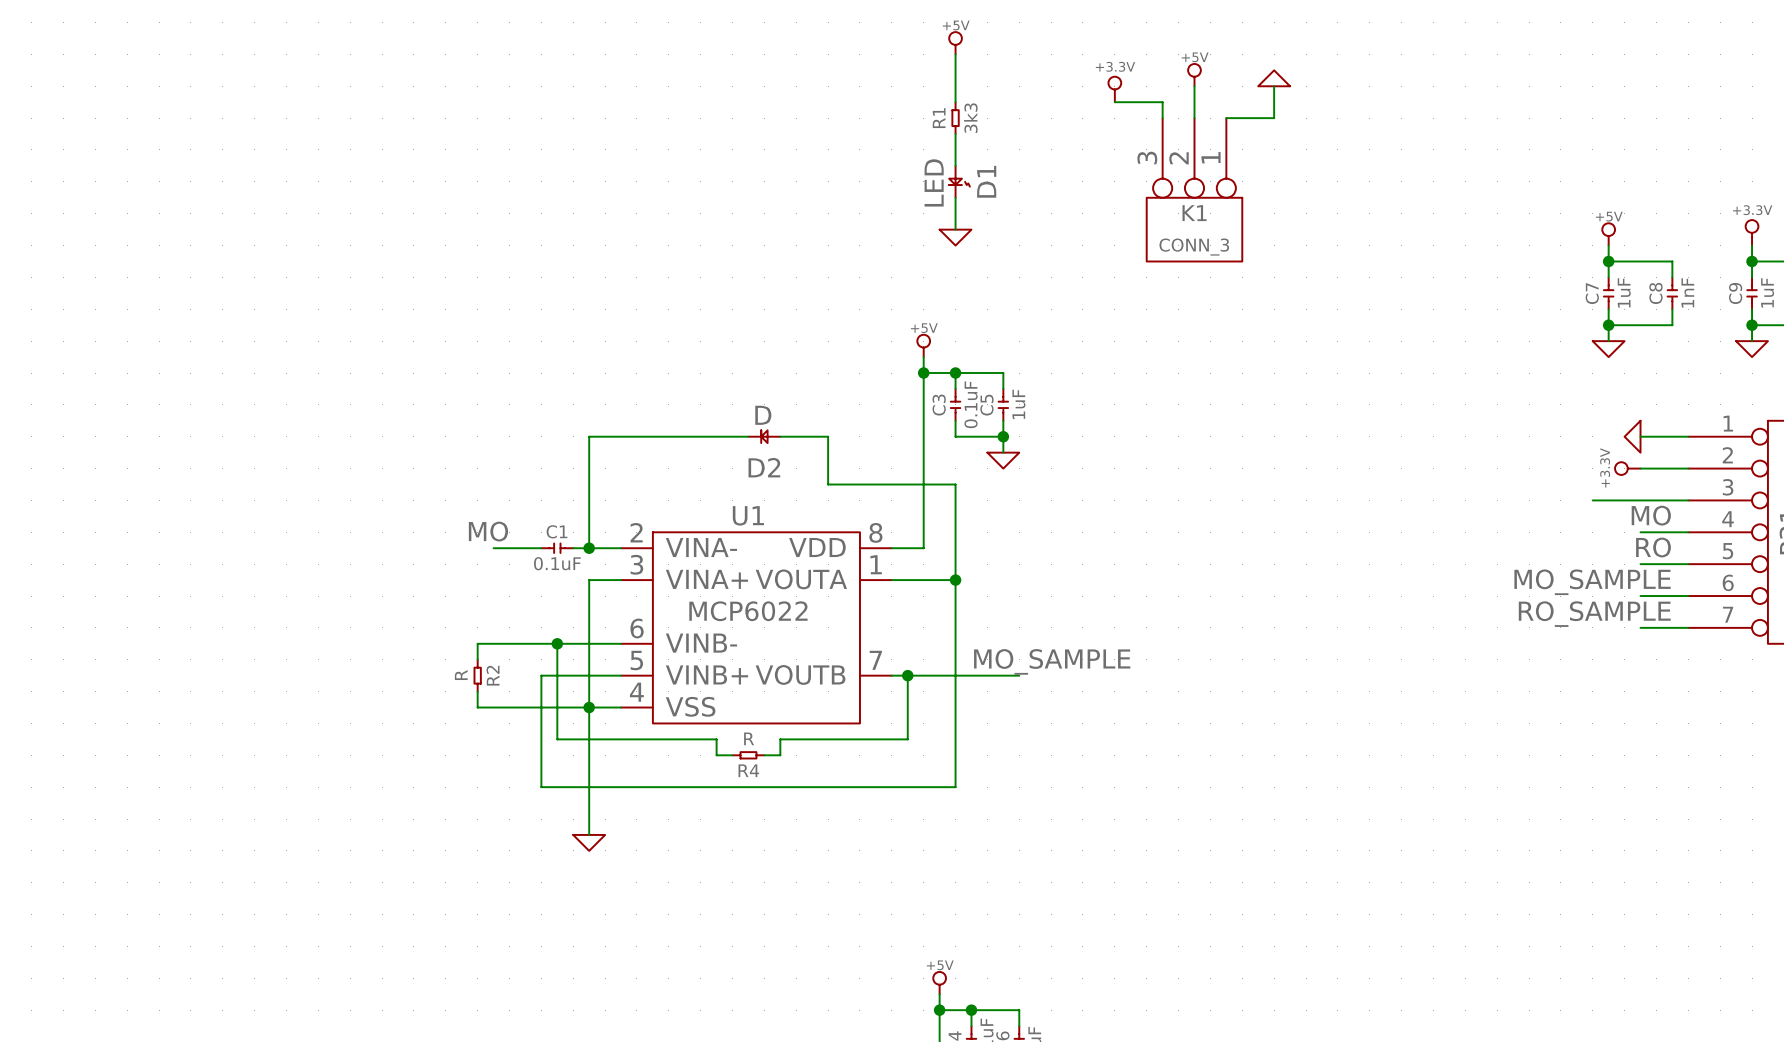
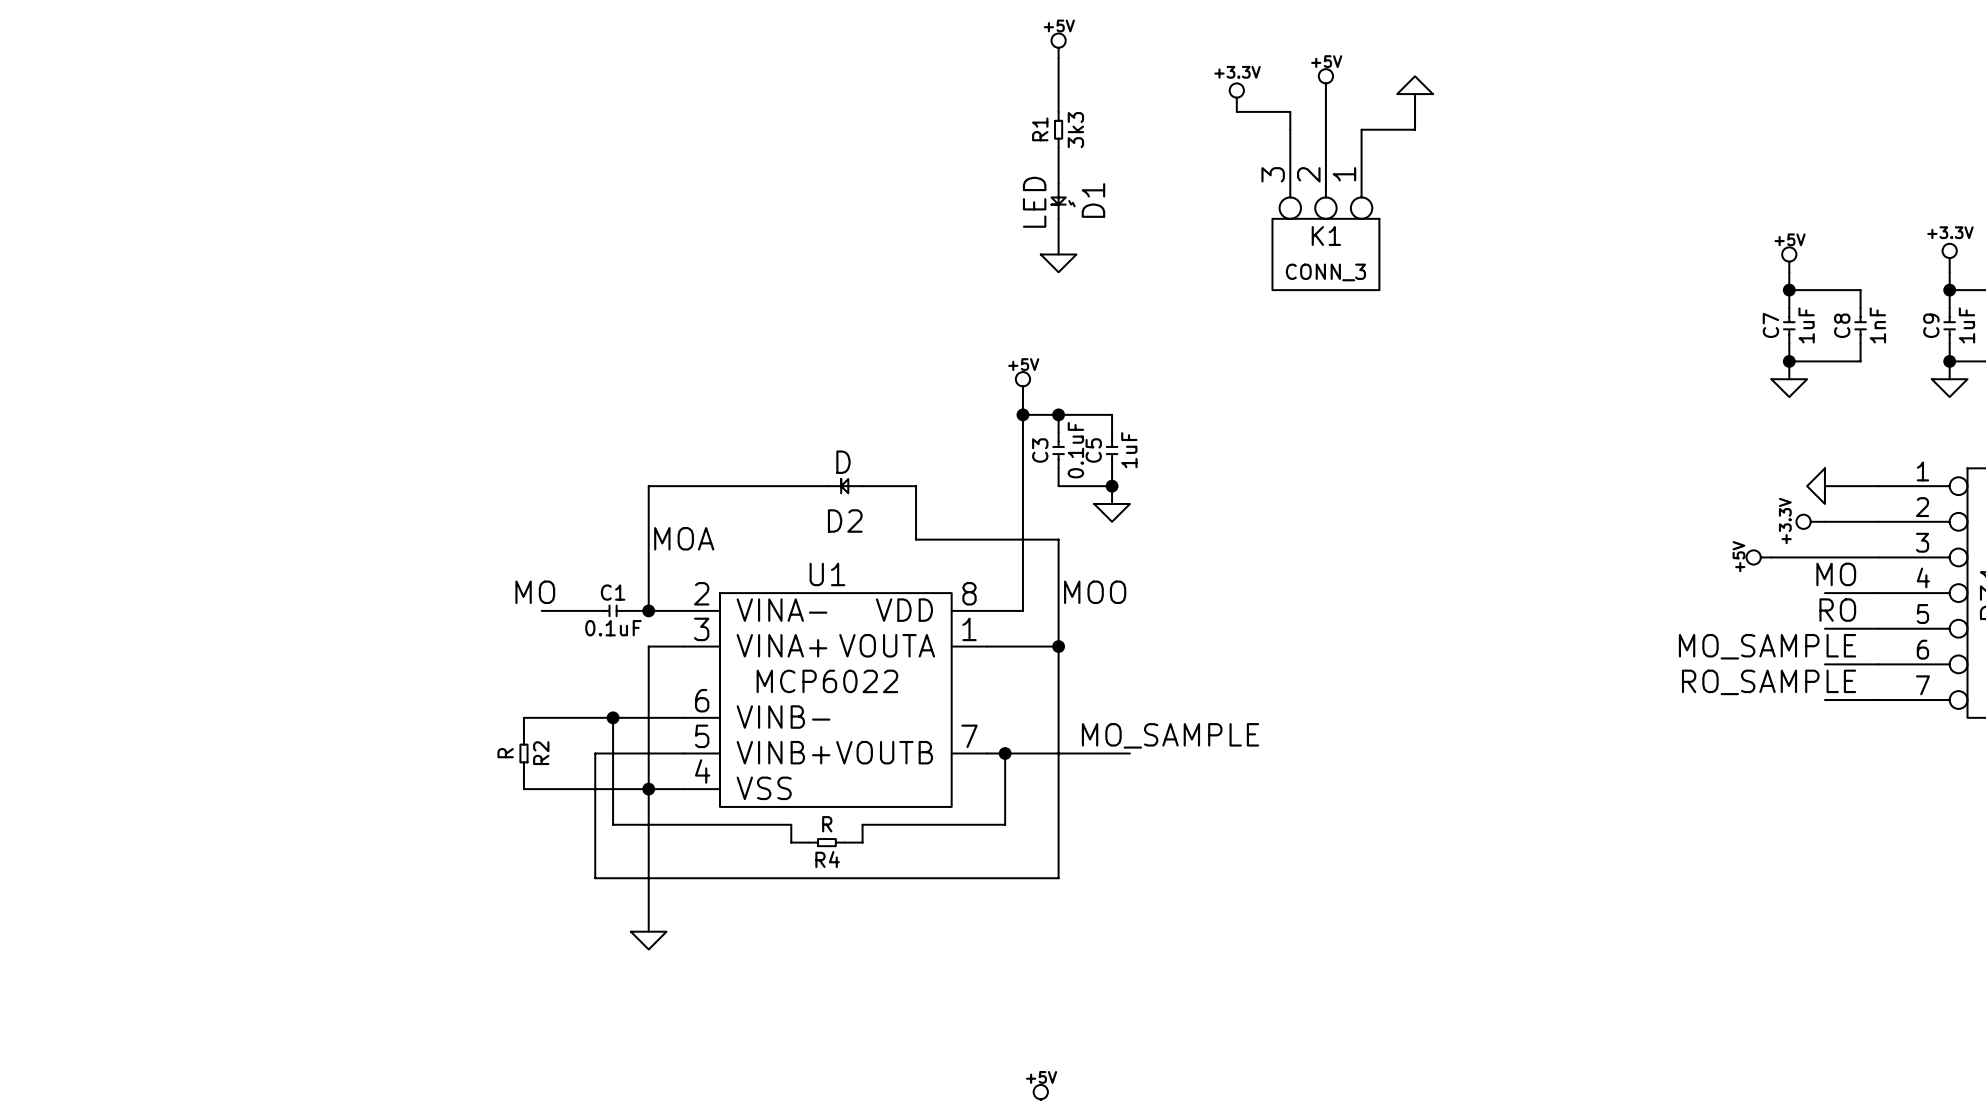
label: none -> MOA (684, 538)
power symbol: none -> +5V (1759, 557)
label: none -> MOO (1095, 592)

